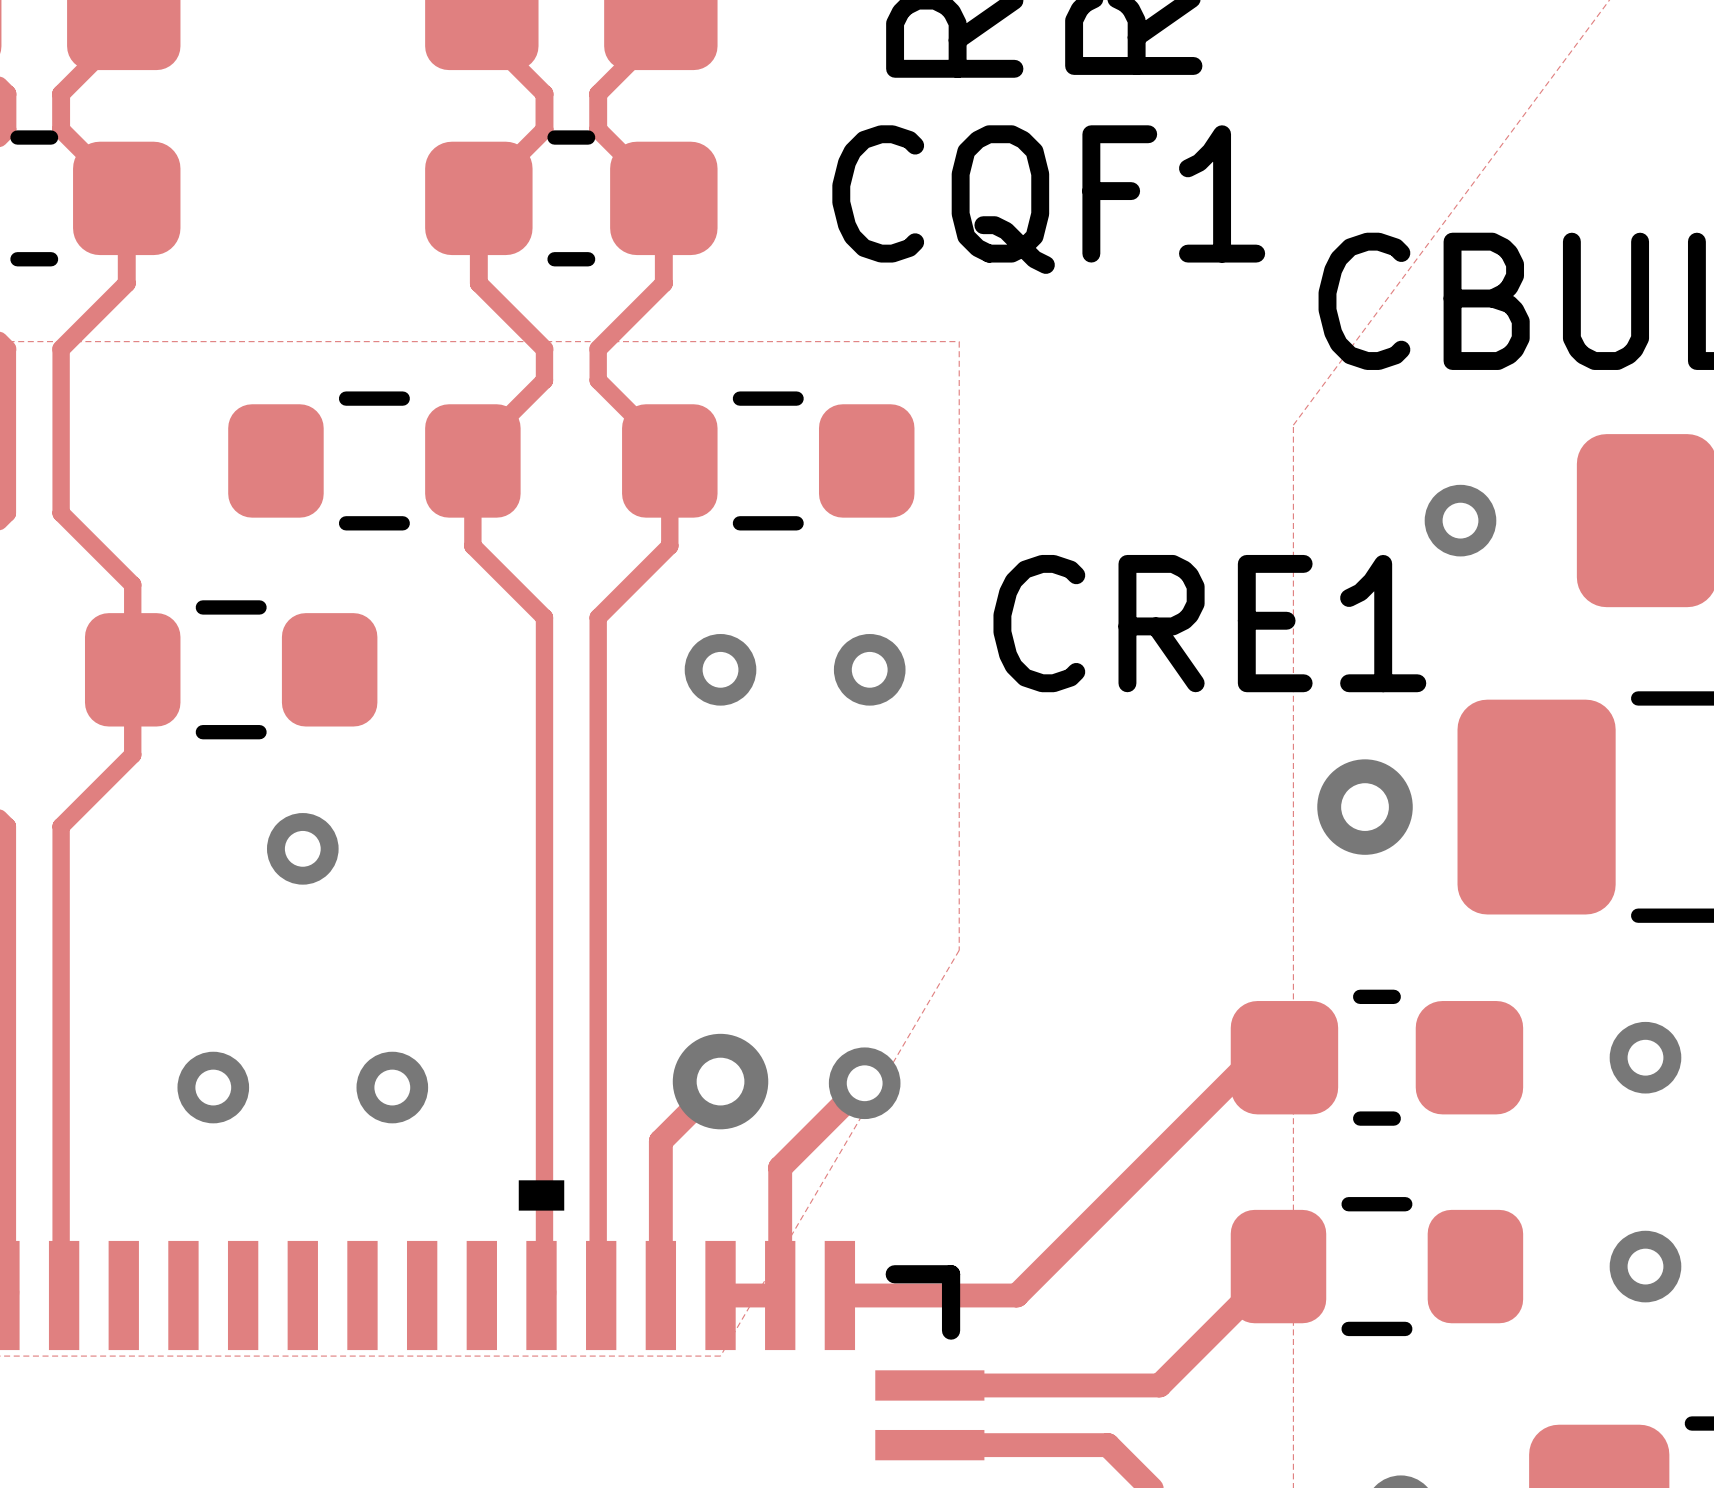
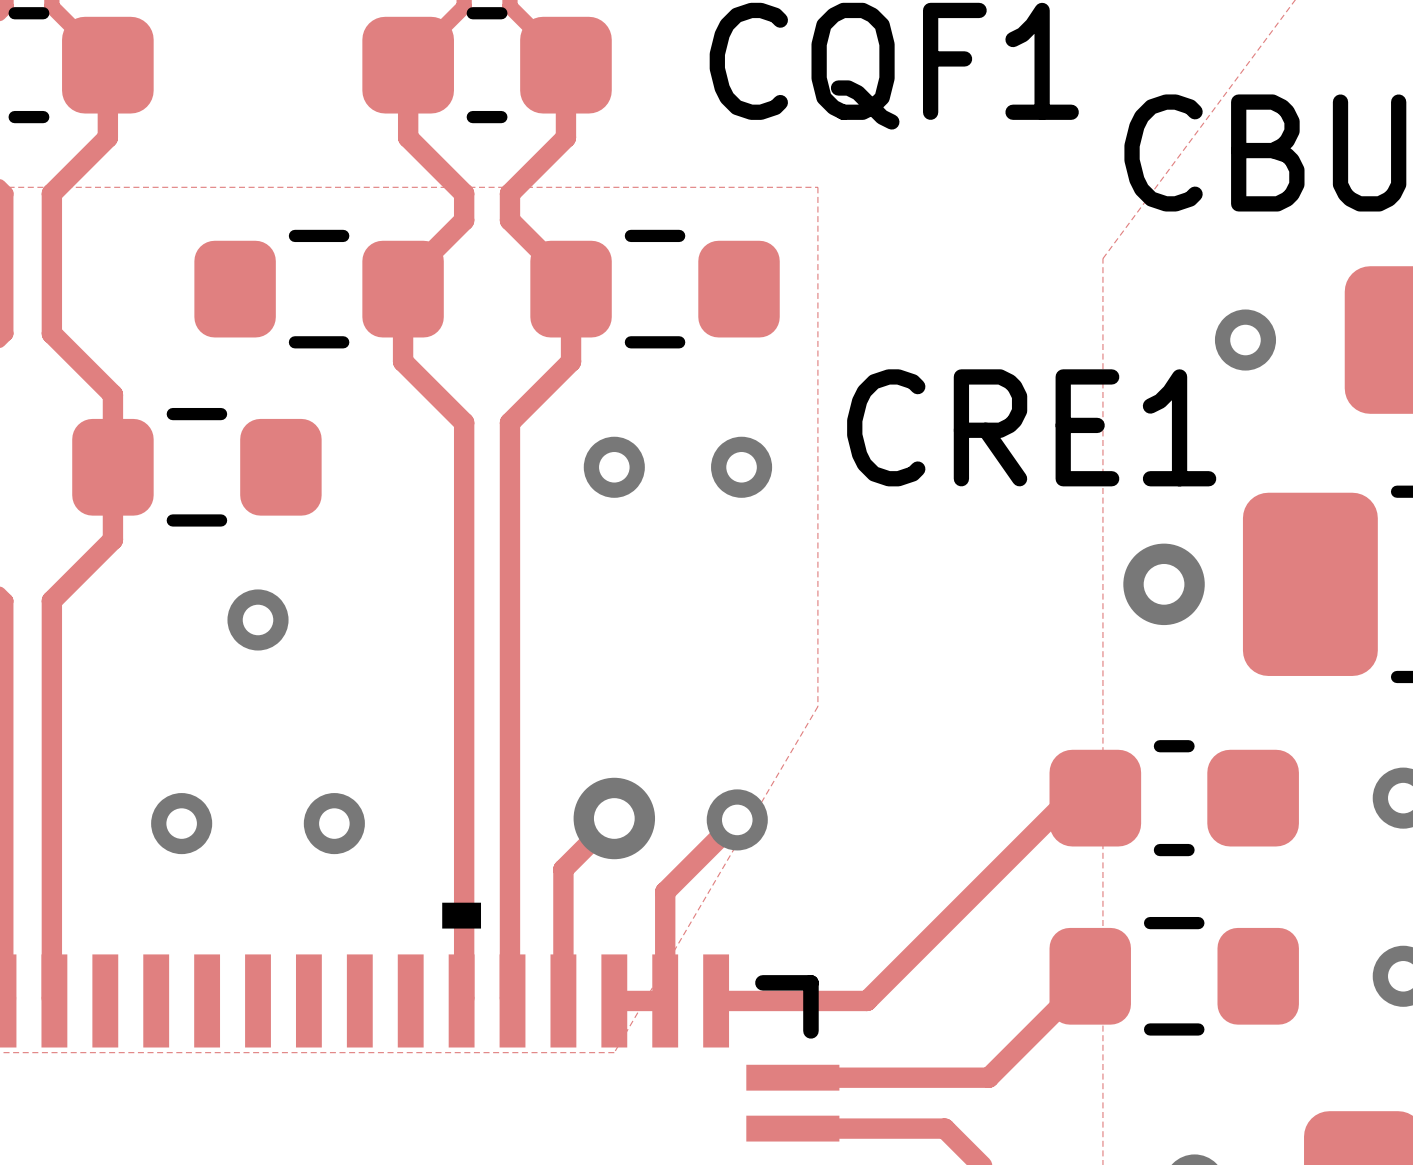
track width: thin (126, 198) (126, 283) (61, 349) (61, 513) (132, 584) (132, 754) (61, 826) (61, 1292) -> thick (107, 65) (107, 137) (51, 193) (51, 333) (112, 394) (112, 539) (51, 600) (51, 998)
track width: thin (478, 198) (478, 283) (544, 349) (544, 380) (472, 452) -> thick (408, 65) (408, 137) (464, 193) (464, 220) (403, 281)
track width: thin (663, 198) (663, 283) (598, 349) (598, 380) (669, 452) -> thick (565, 65) (565, 137) (509, 193) (509, 220) (571, 281)
track width: thin (472, 460) (472, 545) (544, 617) (544, 1292) -> thick (403, 289) (403, 361) (464, 422) (464, 998)
track width: thin (669, 460) (669, 545) (598, 617) (598, 1292) -> thick (571, 289) (571, 361) (509, 422) (509, 998)

